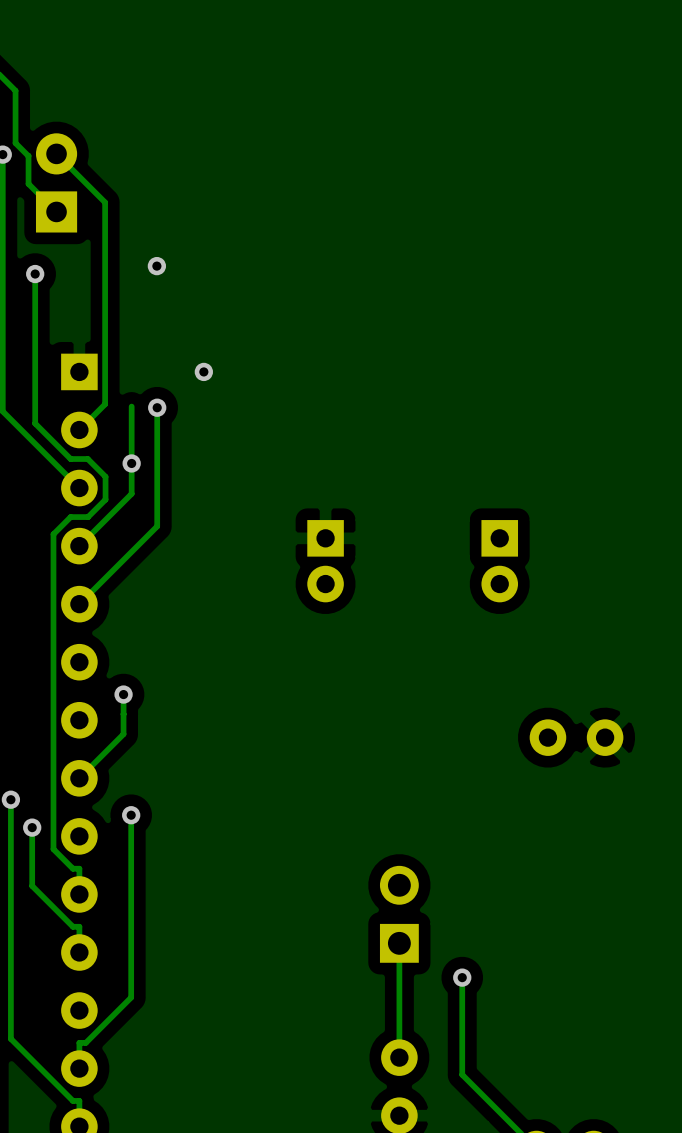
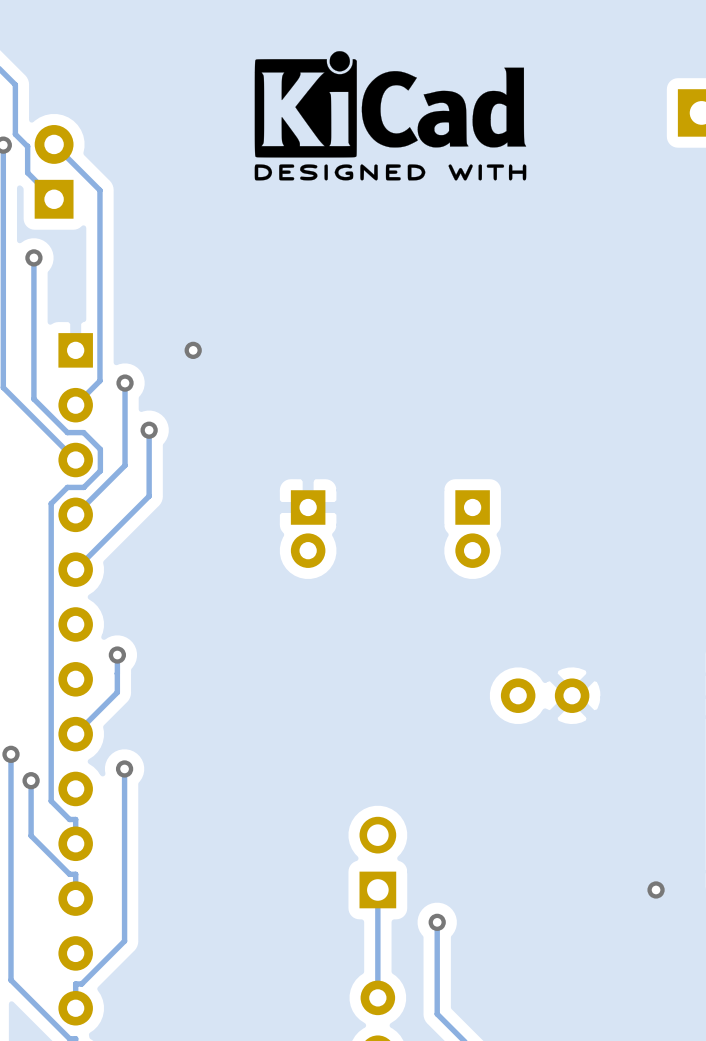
drawing: none -> [254, 51, 527, 181]
via: (156, 266) -> none
via: none -> (125, 383)
track: (157, 407) (157, 456) -> none
via: (157, 407) -> none
via: none -> (149, 430)
via: (131, 463) -> none

